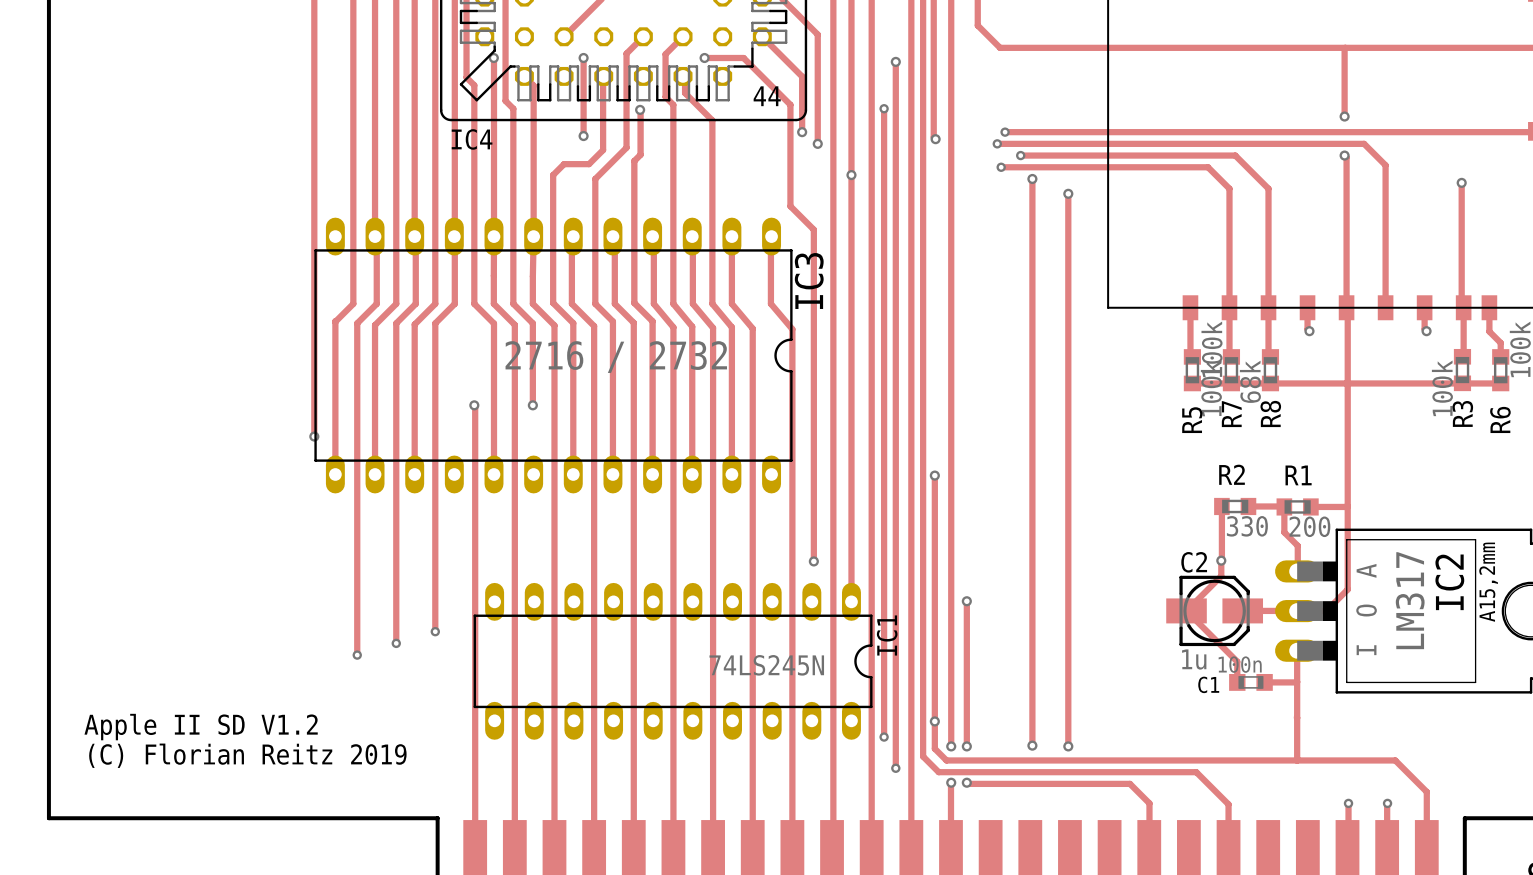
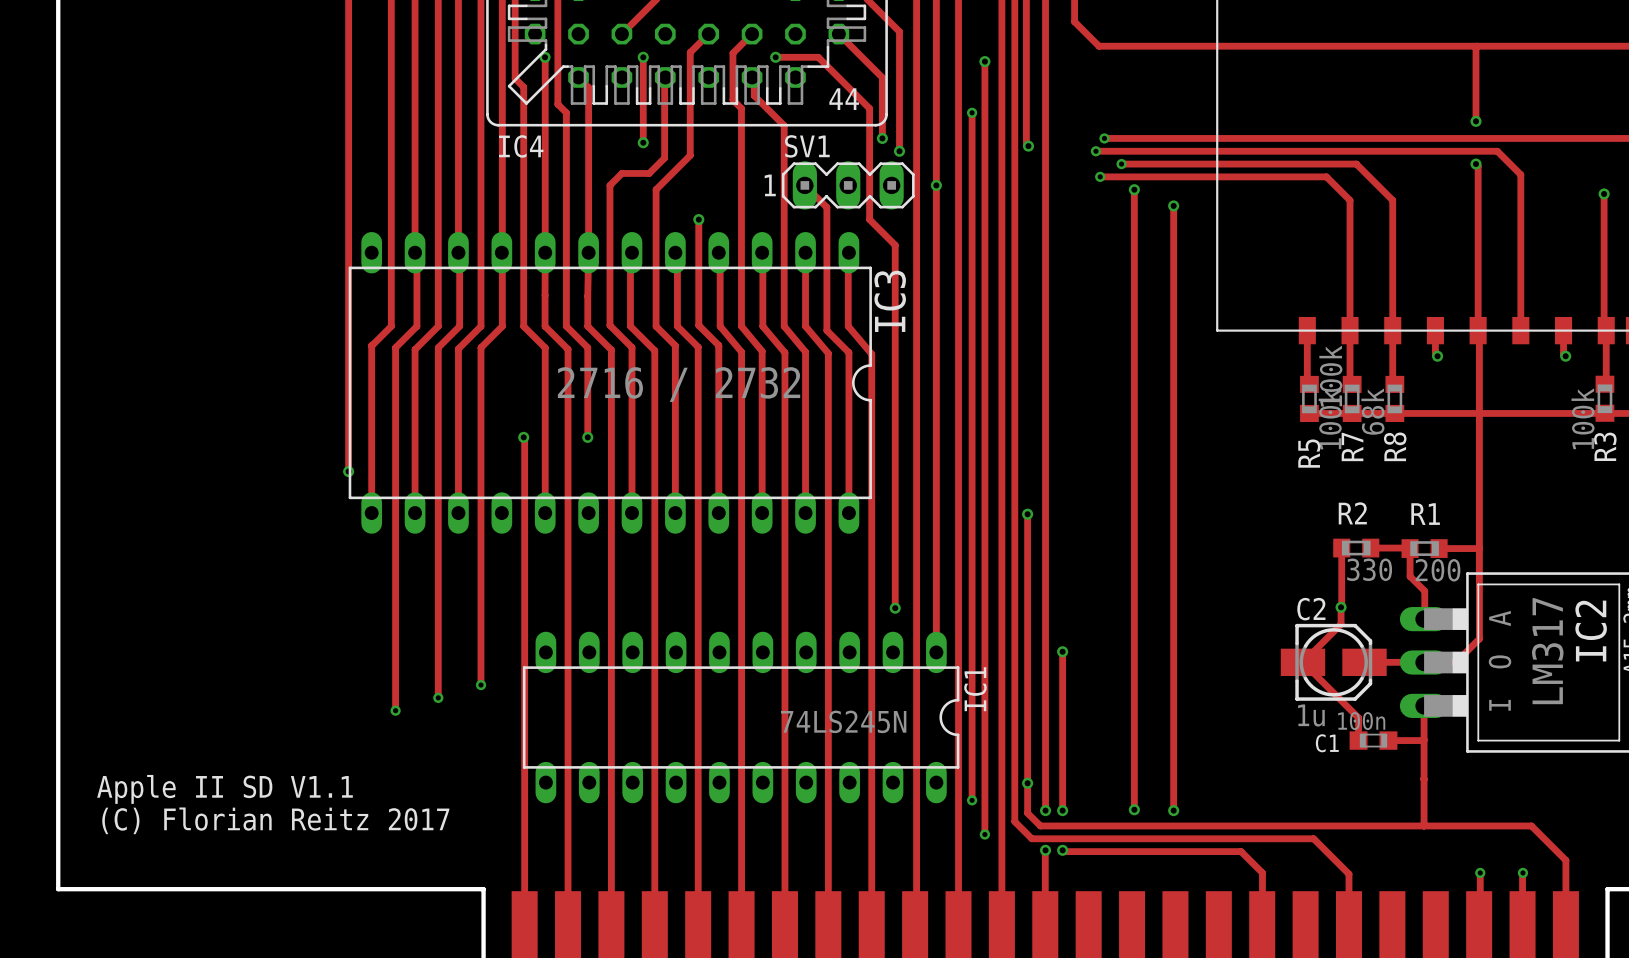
track: (640, 109) (640, 154) (634, 161) (634, 206) -> none
via: (640, 109) -> none
track: none -> (804, 185) (826, 207) (826, 330) (848, 352) (848, 513)
SV1: none -> (848, 185)
via: none -> (698, 219)
text: Apple II SD V1.2 (201, 727) -> Apple II SD V1.1 (224, 789)
text: (C) Florian Reitz 2019 (247, 755) -> (C) Florian Reitz 2017 (275, 820)

